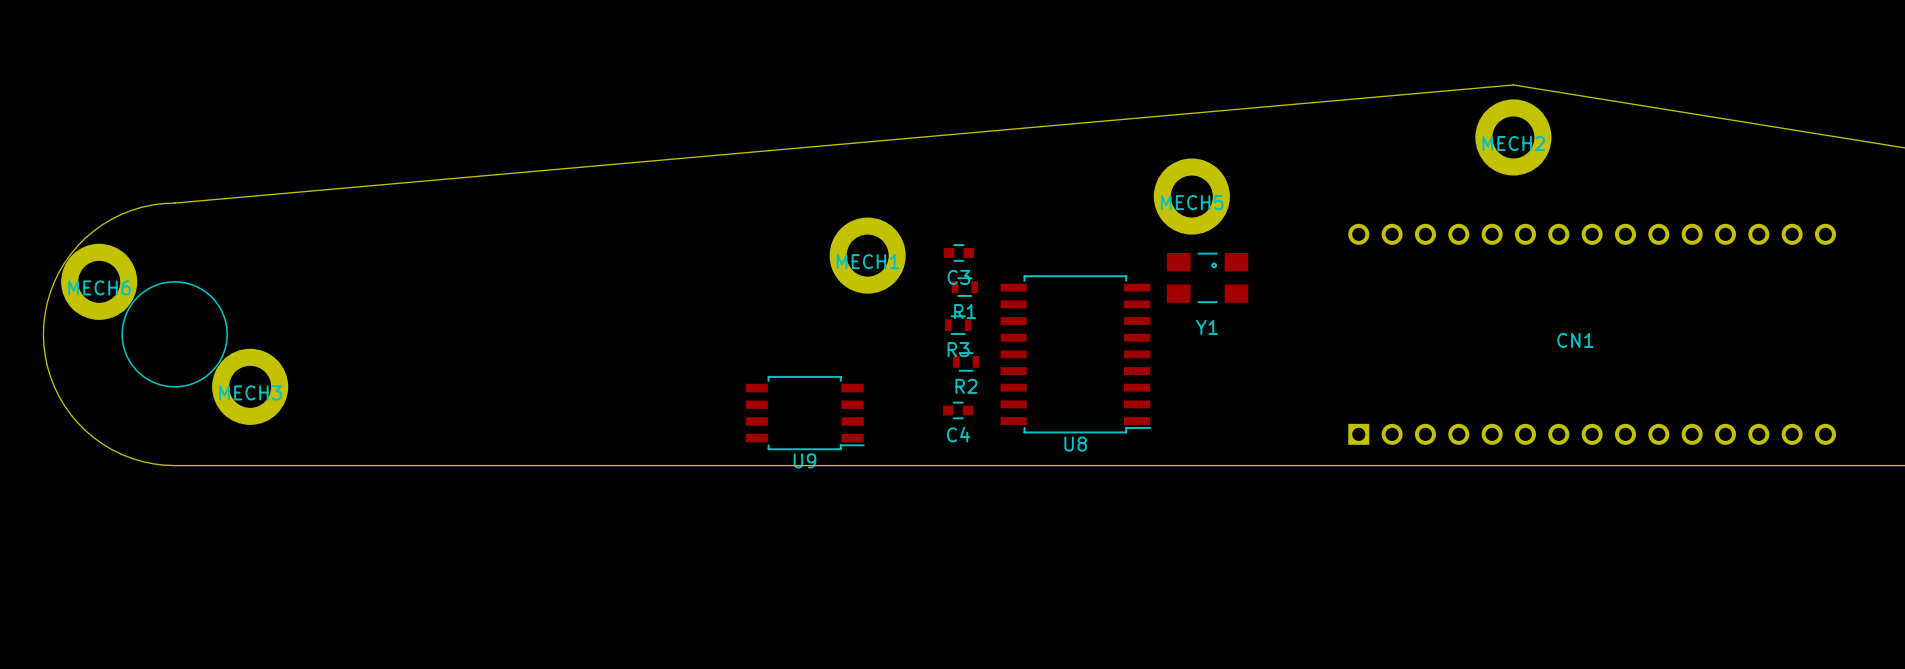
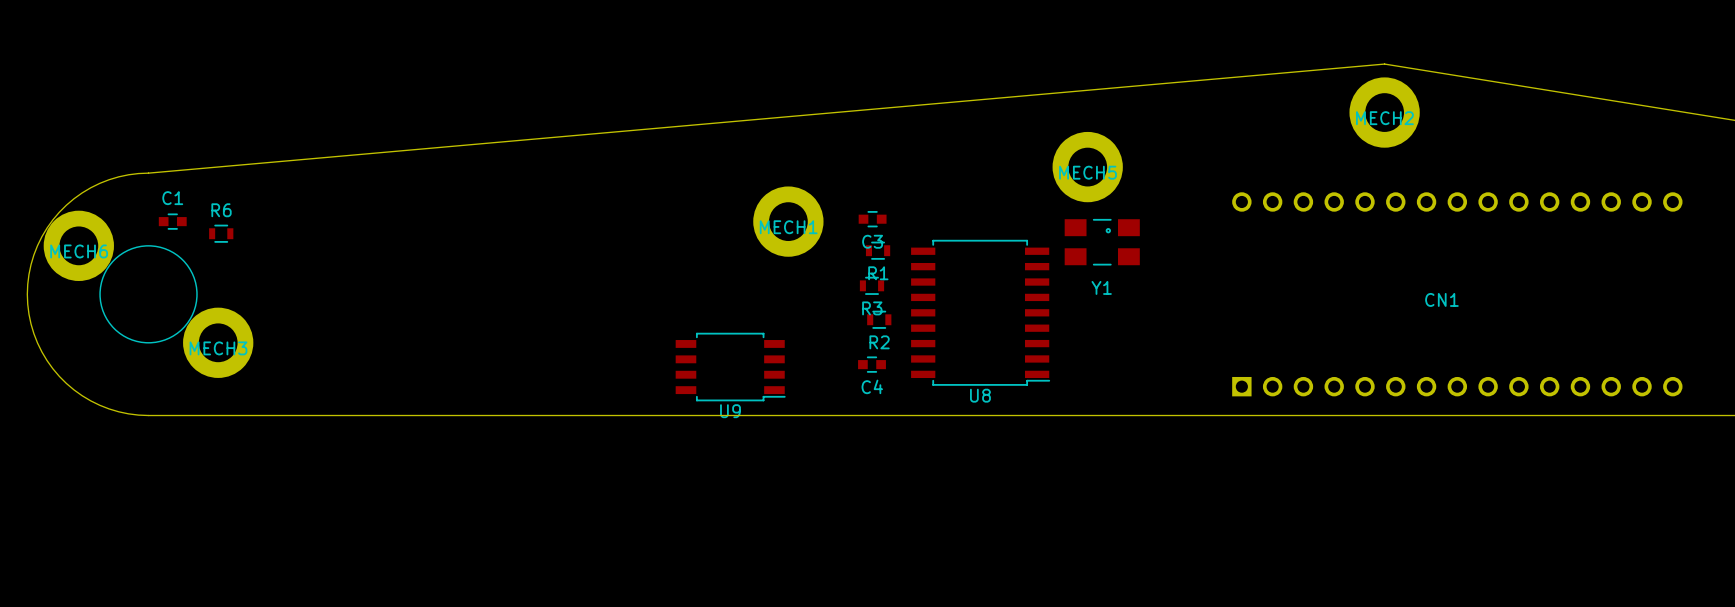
C1: none -> (172, 221)
R6: none -> (221, 233)

